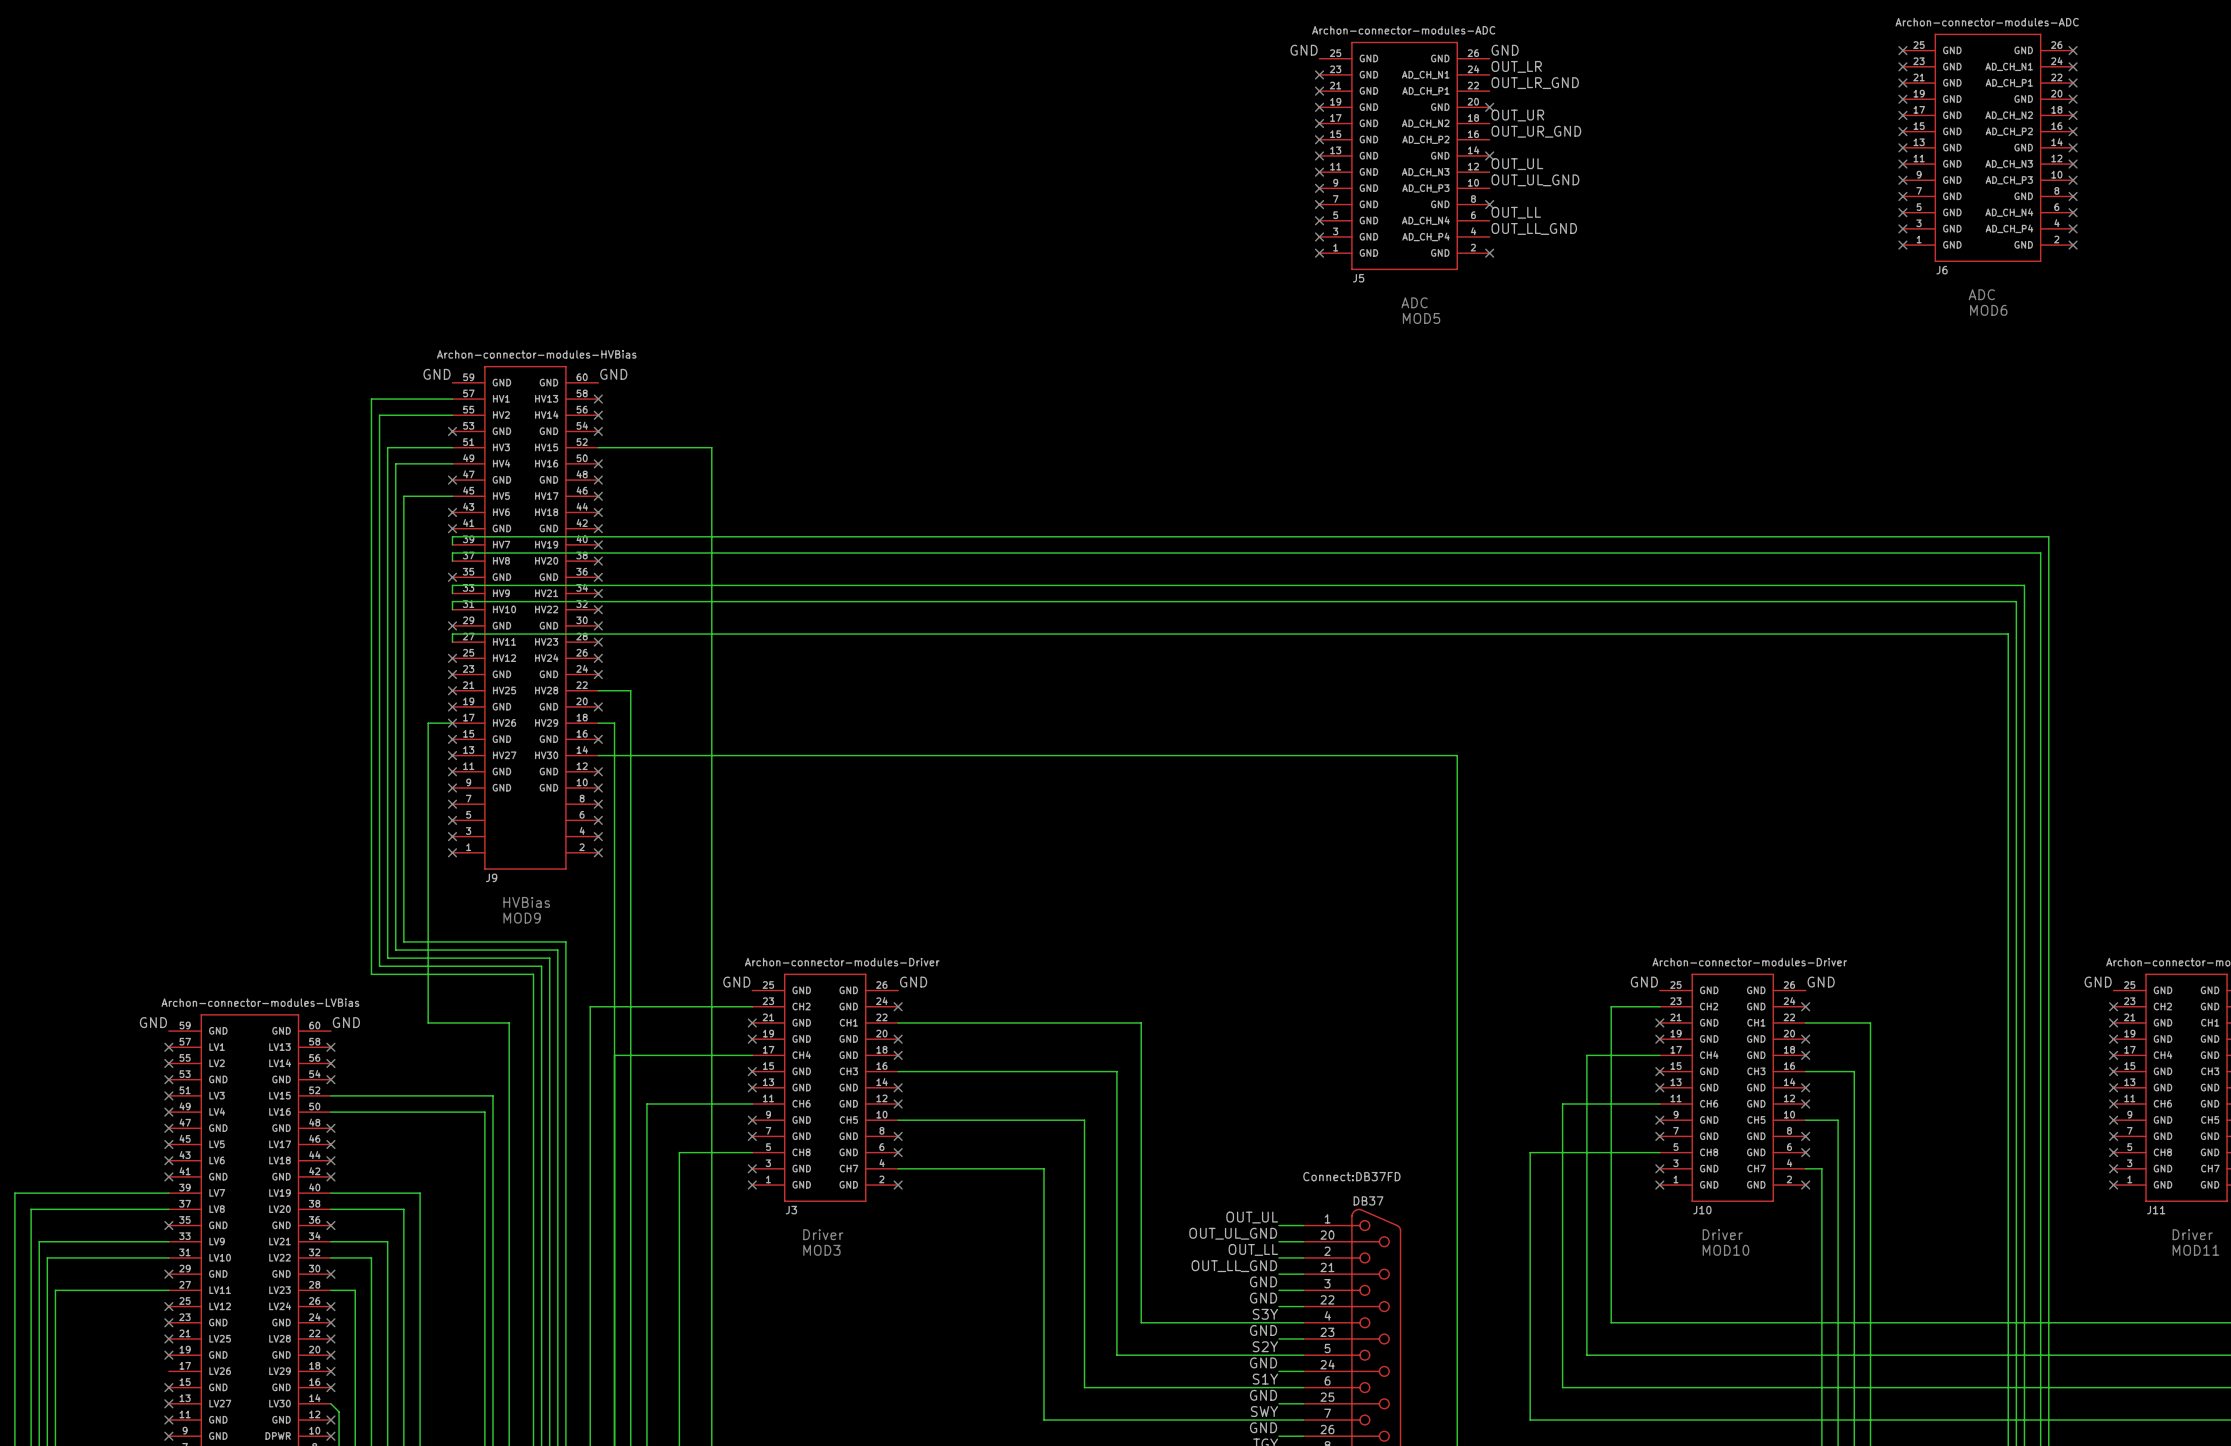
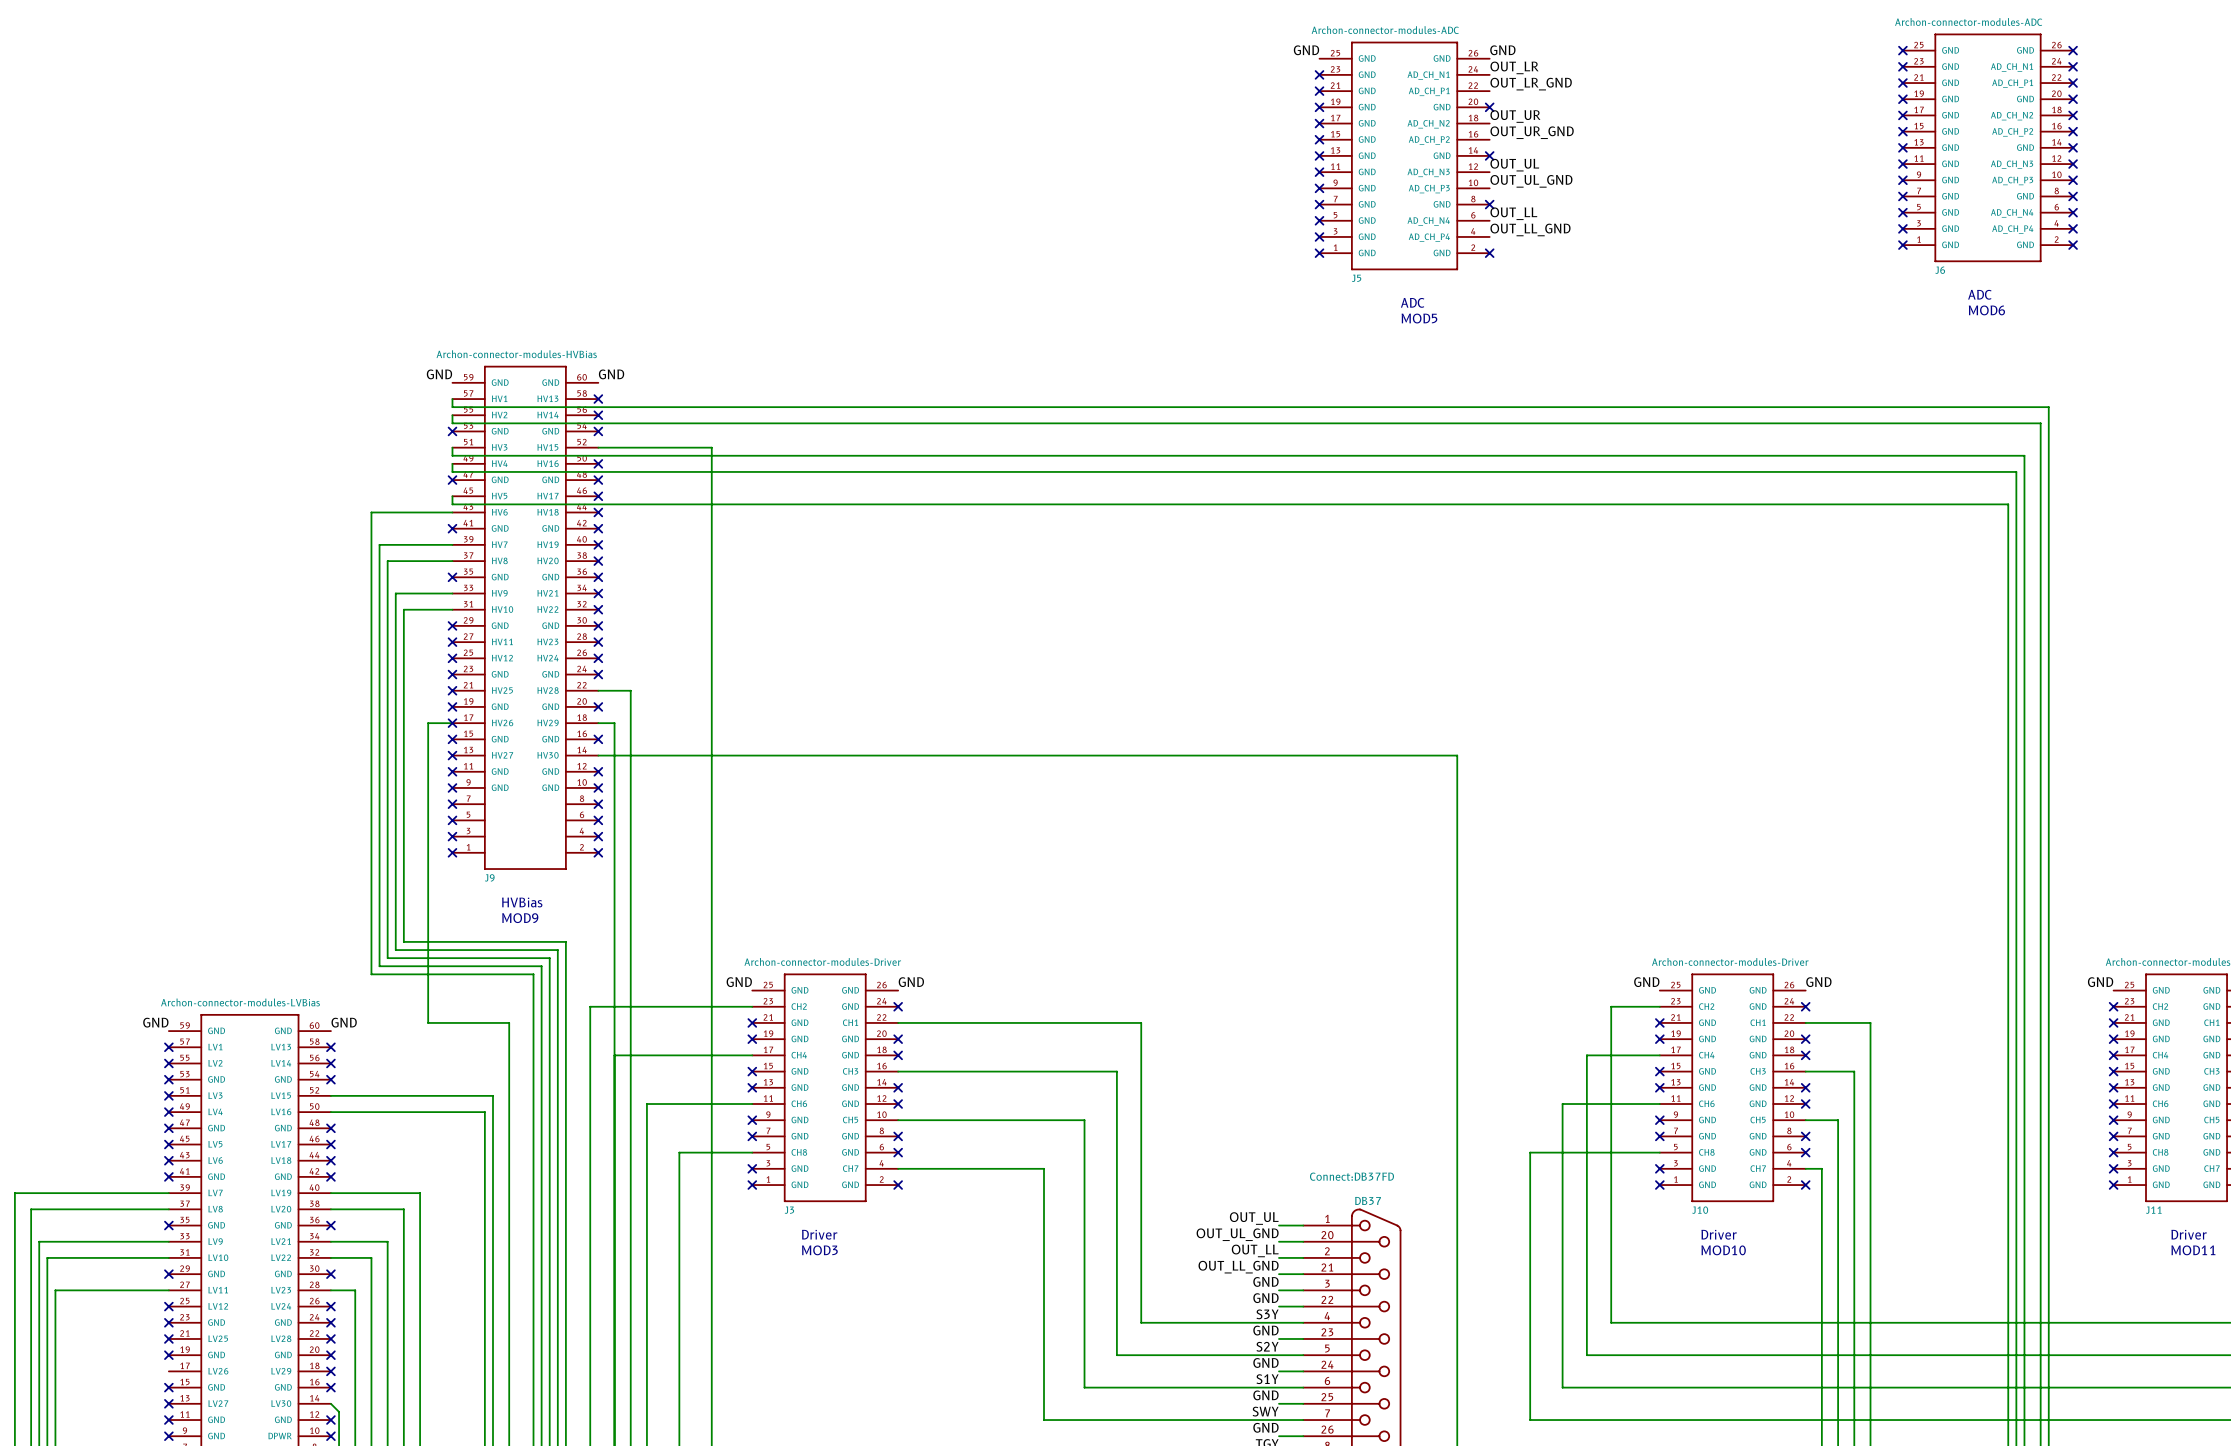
wire: (452, 399) (371, 399) (371, 512) -> (452, 512) (371, 512)
wire: (452, 415) (379, 415) (379, 544) -> (452, 544) (379, 544)
wire: (452, 447) (387, 447) (387, 561) -> (452, 561) (387, 561)
wire: (452, 463) (395, 463) (395, 593) -> (452, 593) (395, 593)
wire: (452, 496) (403, 496) (403, 609) -> (452, 609) (403, 609)
no-connect mark: (452, 512) -> none
wire: (2048, 536) (452, 536) (452, 544) -> (2048, 536) (2048, 407) (452, 407) (452, 399)
wire: (2040, 553) (452, 553) (452, 561) -> (2040, 553) (2040, 423) (452, 423) (452, 415)
wire: (2024, 585) (452, 585) (452, 593) -> (2024, 585) (2024, 455) (452, 455) (452, 447)
wire: (2016, 601) (452, 601) (452, 609) -> (2016, 601) (2016, 471) (452, 471) (452, 463)
wire: (2008, 634) (452, 634) (452, 642) -> (2008, 634) (2008, 504) (452, 504) (452, 496)
no-connect mark: none -> (452, 642)

